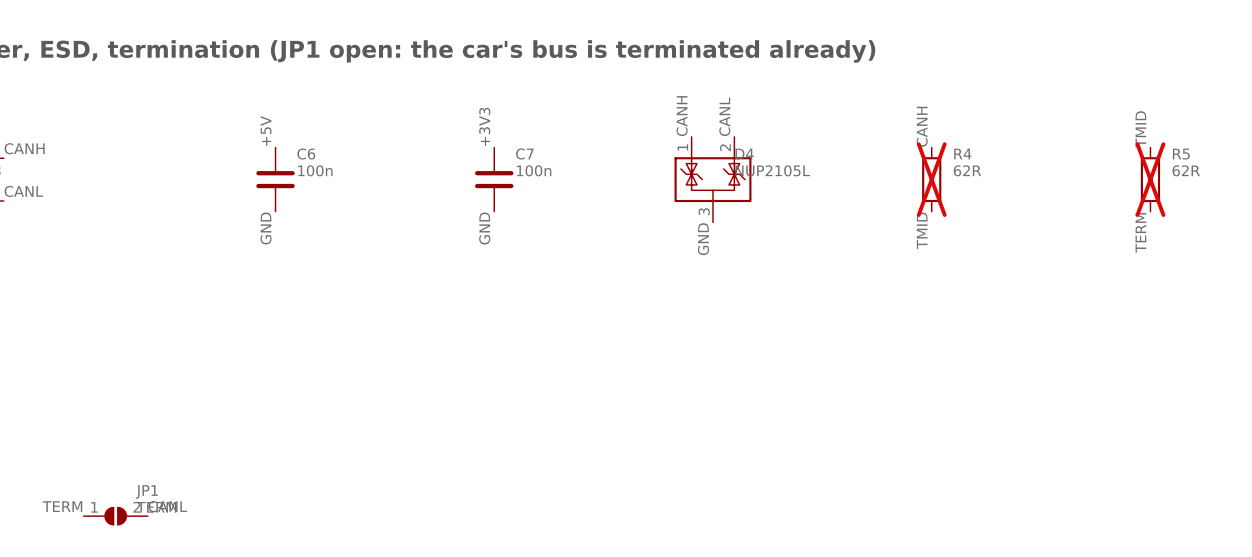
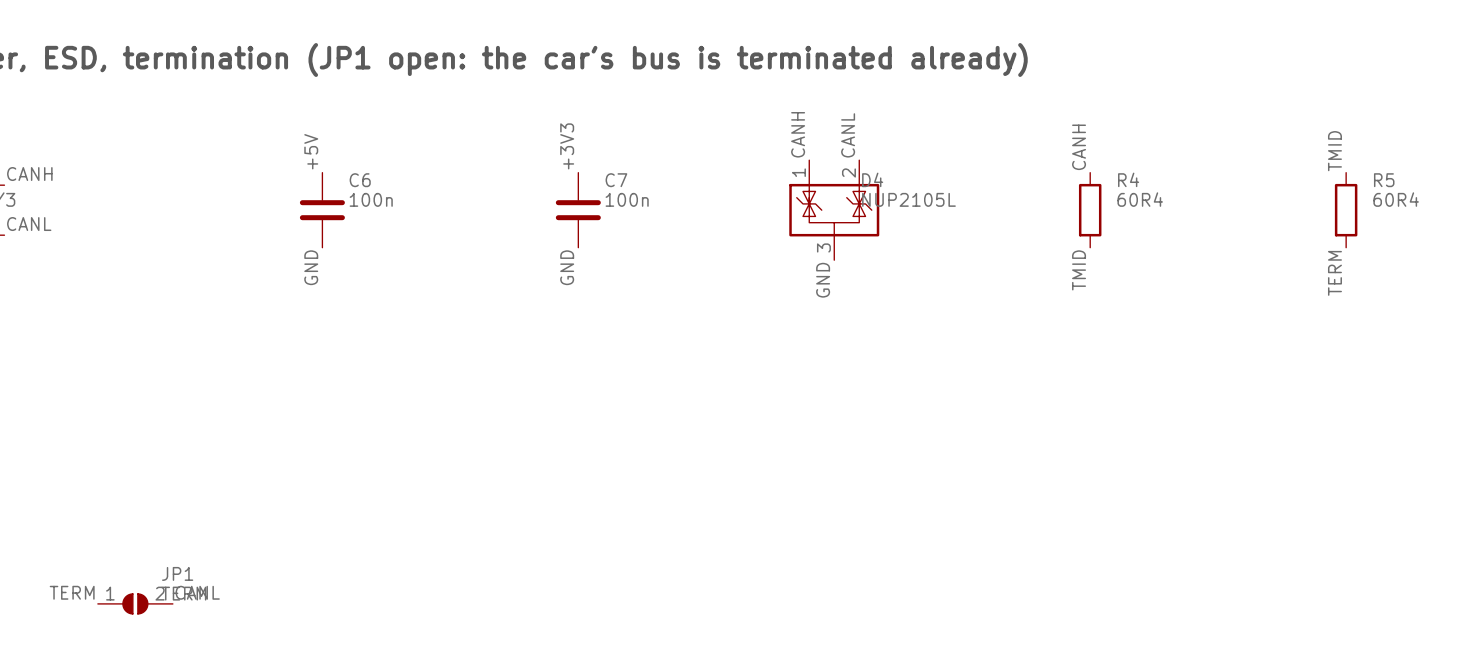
R4 value: 62R (967, 170) -> 60R4 (1140, 199)
R5 value: 62R (1186, 170) -> 60R4 (1396, 199)
R4 do-not-place cross: (931, 179) -> none
R5 do-not-place cross: (1150, 179) -> none

